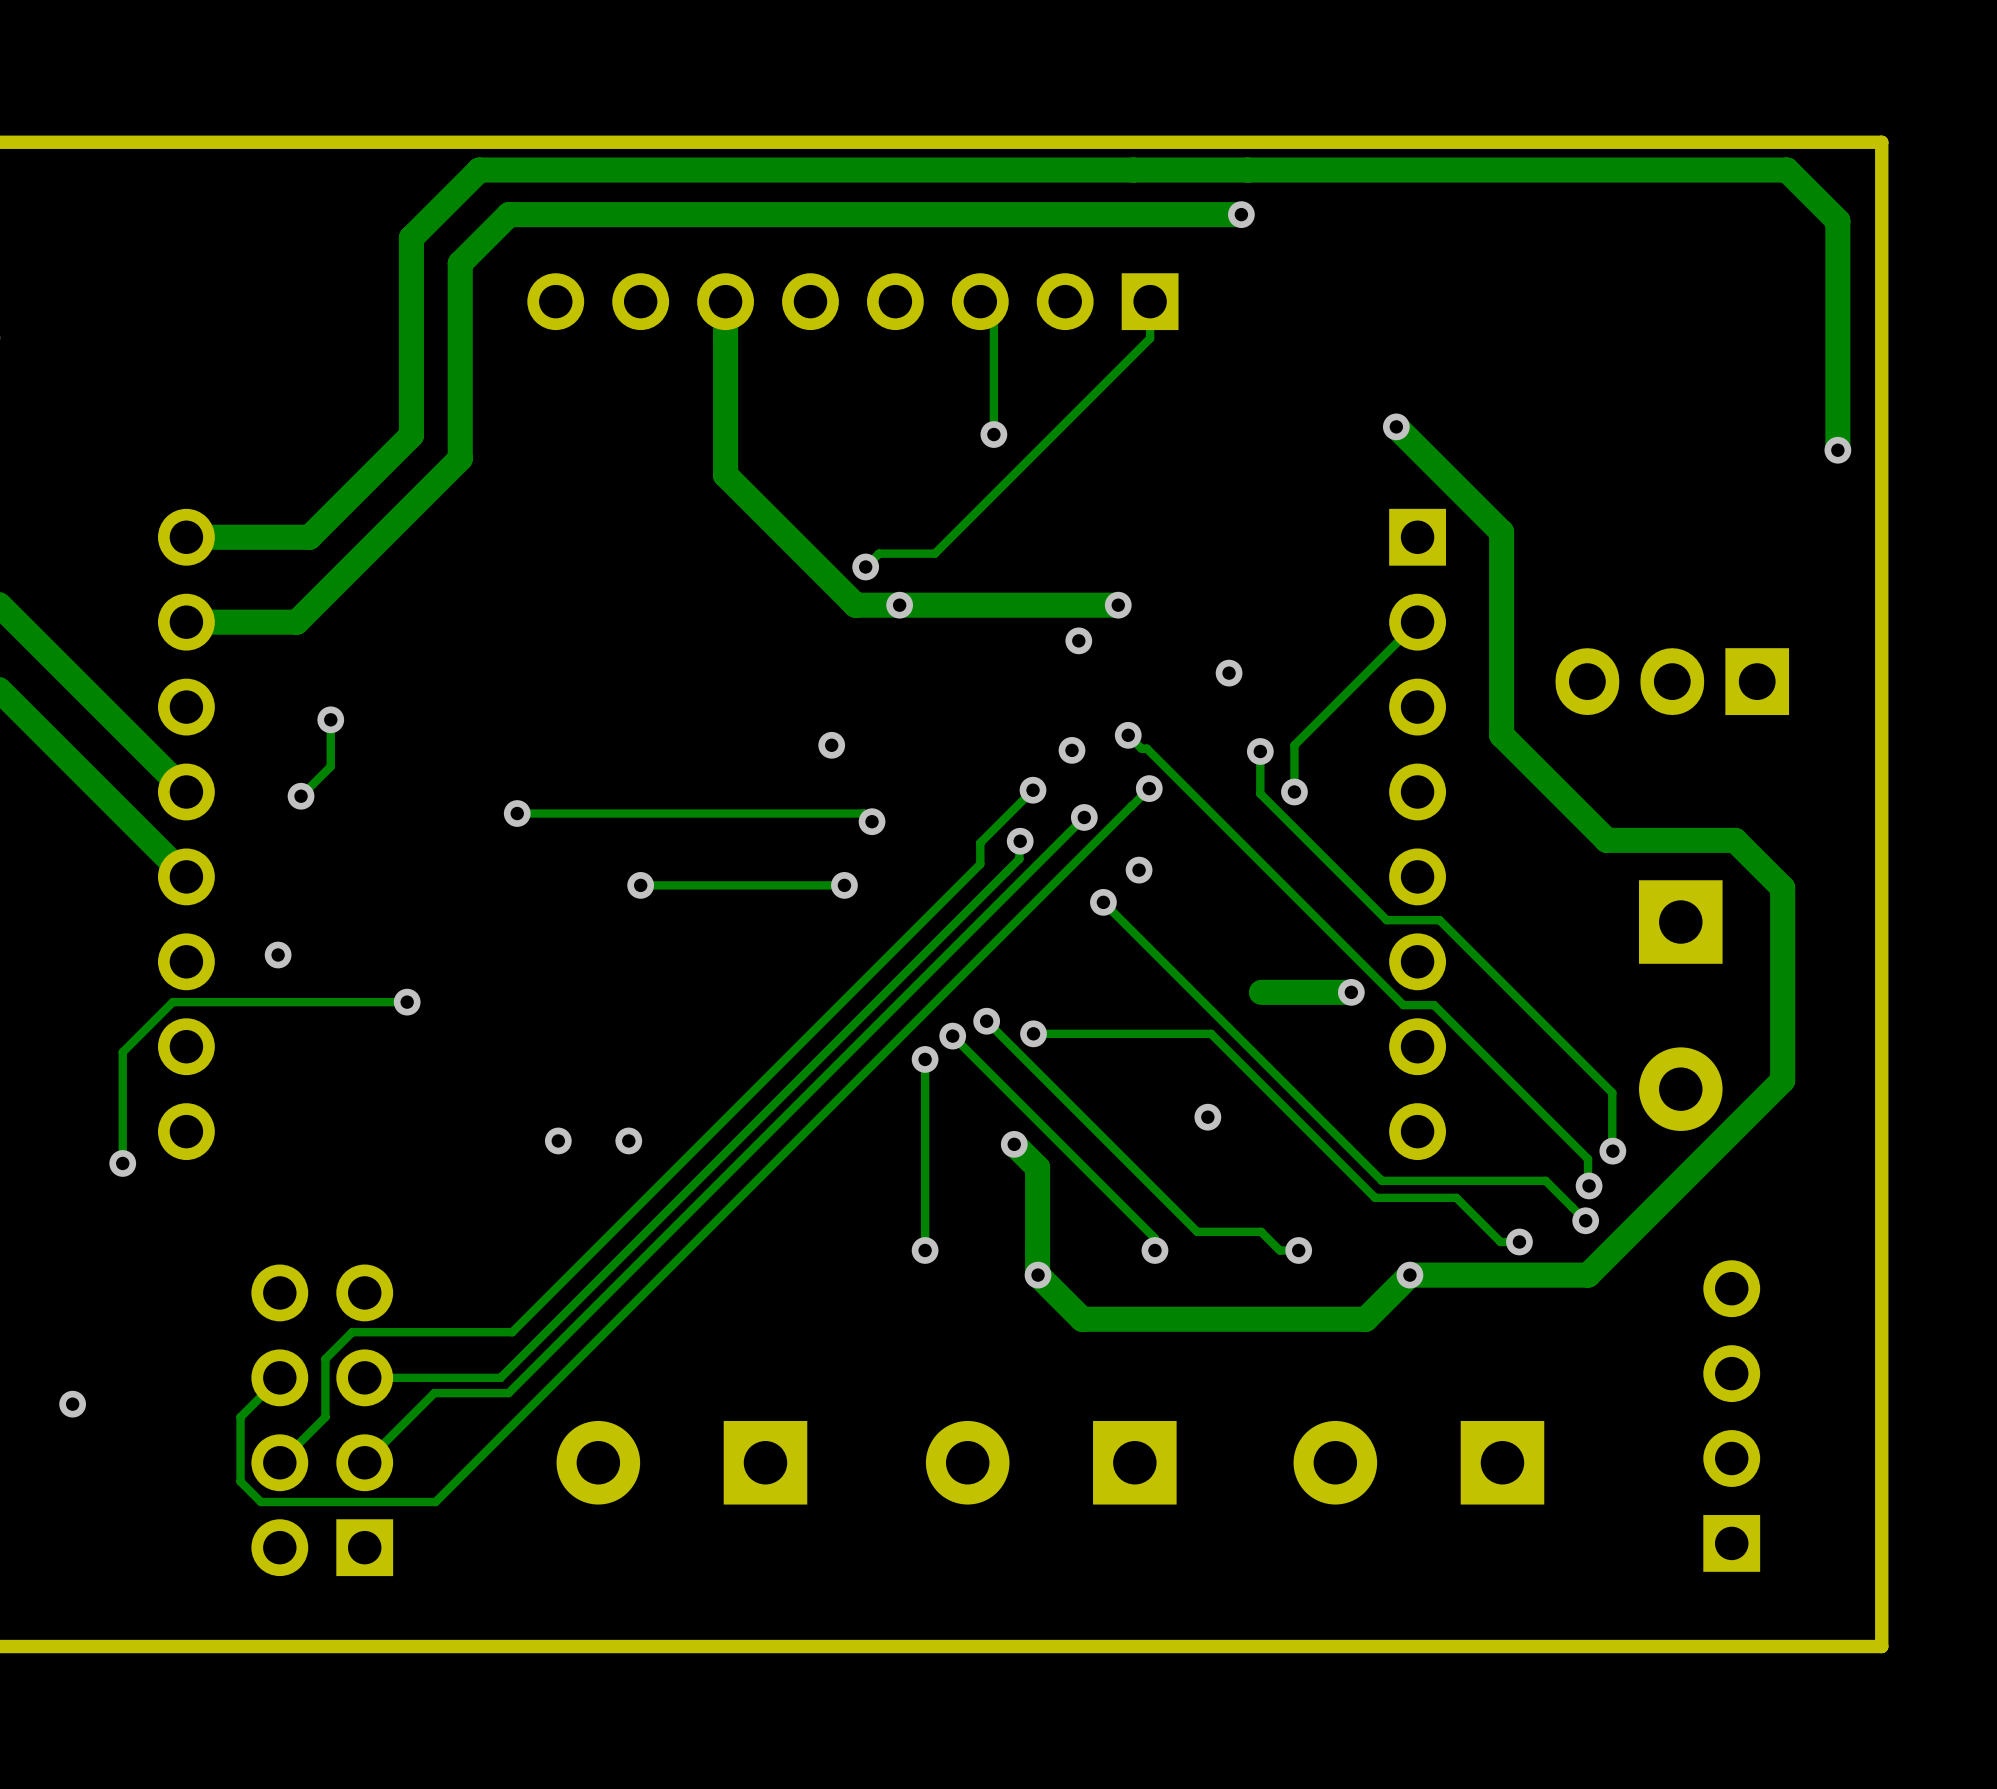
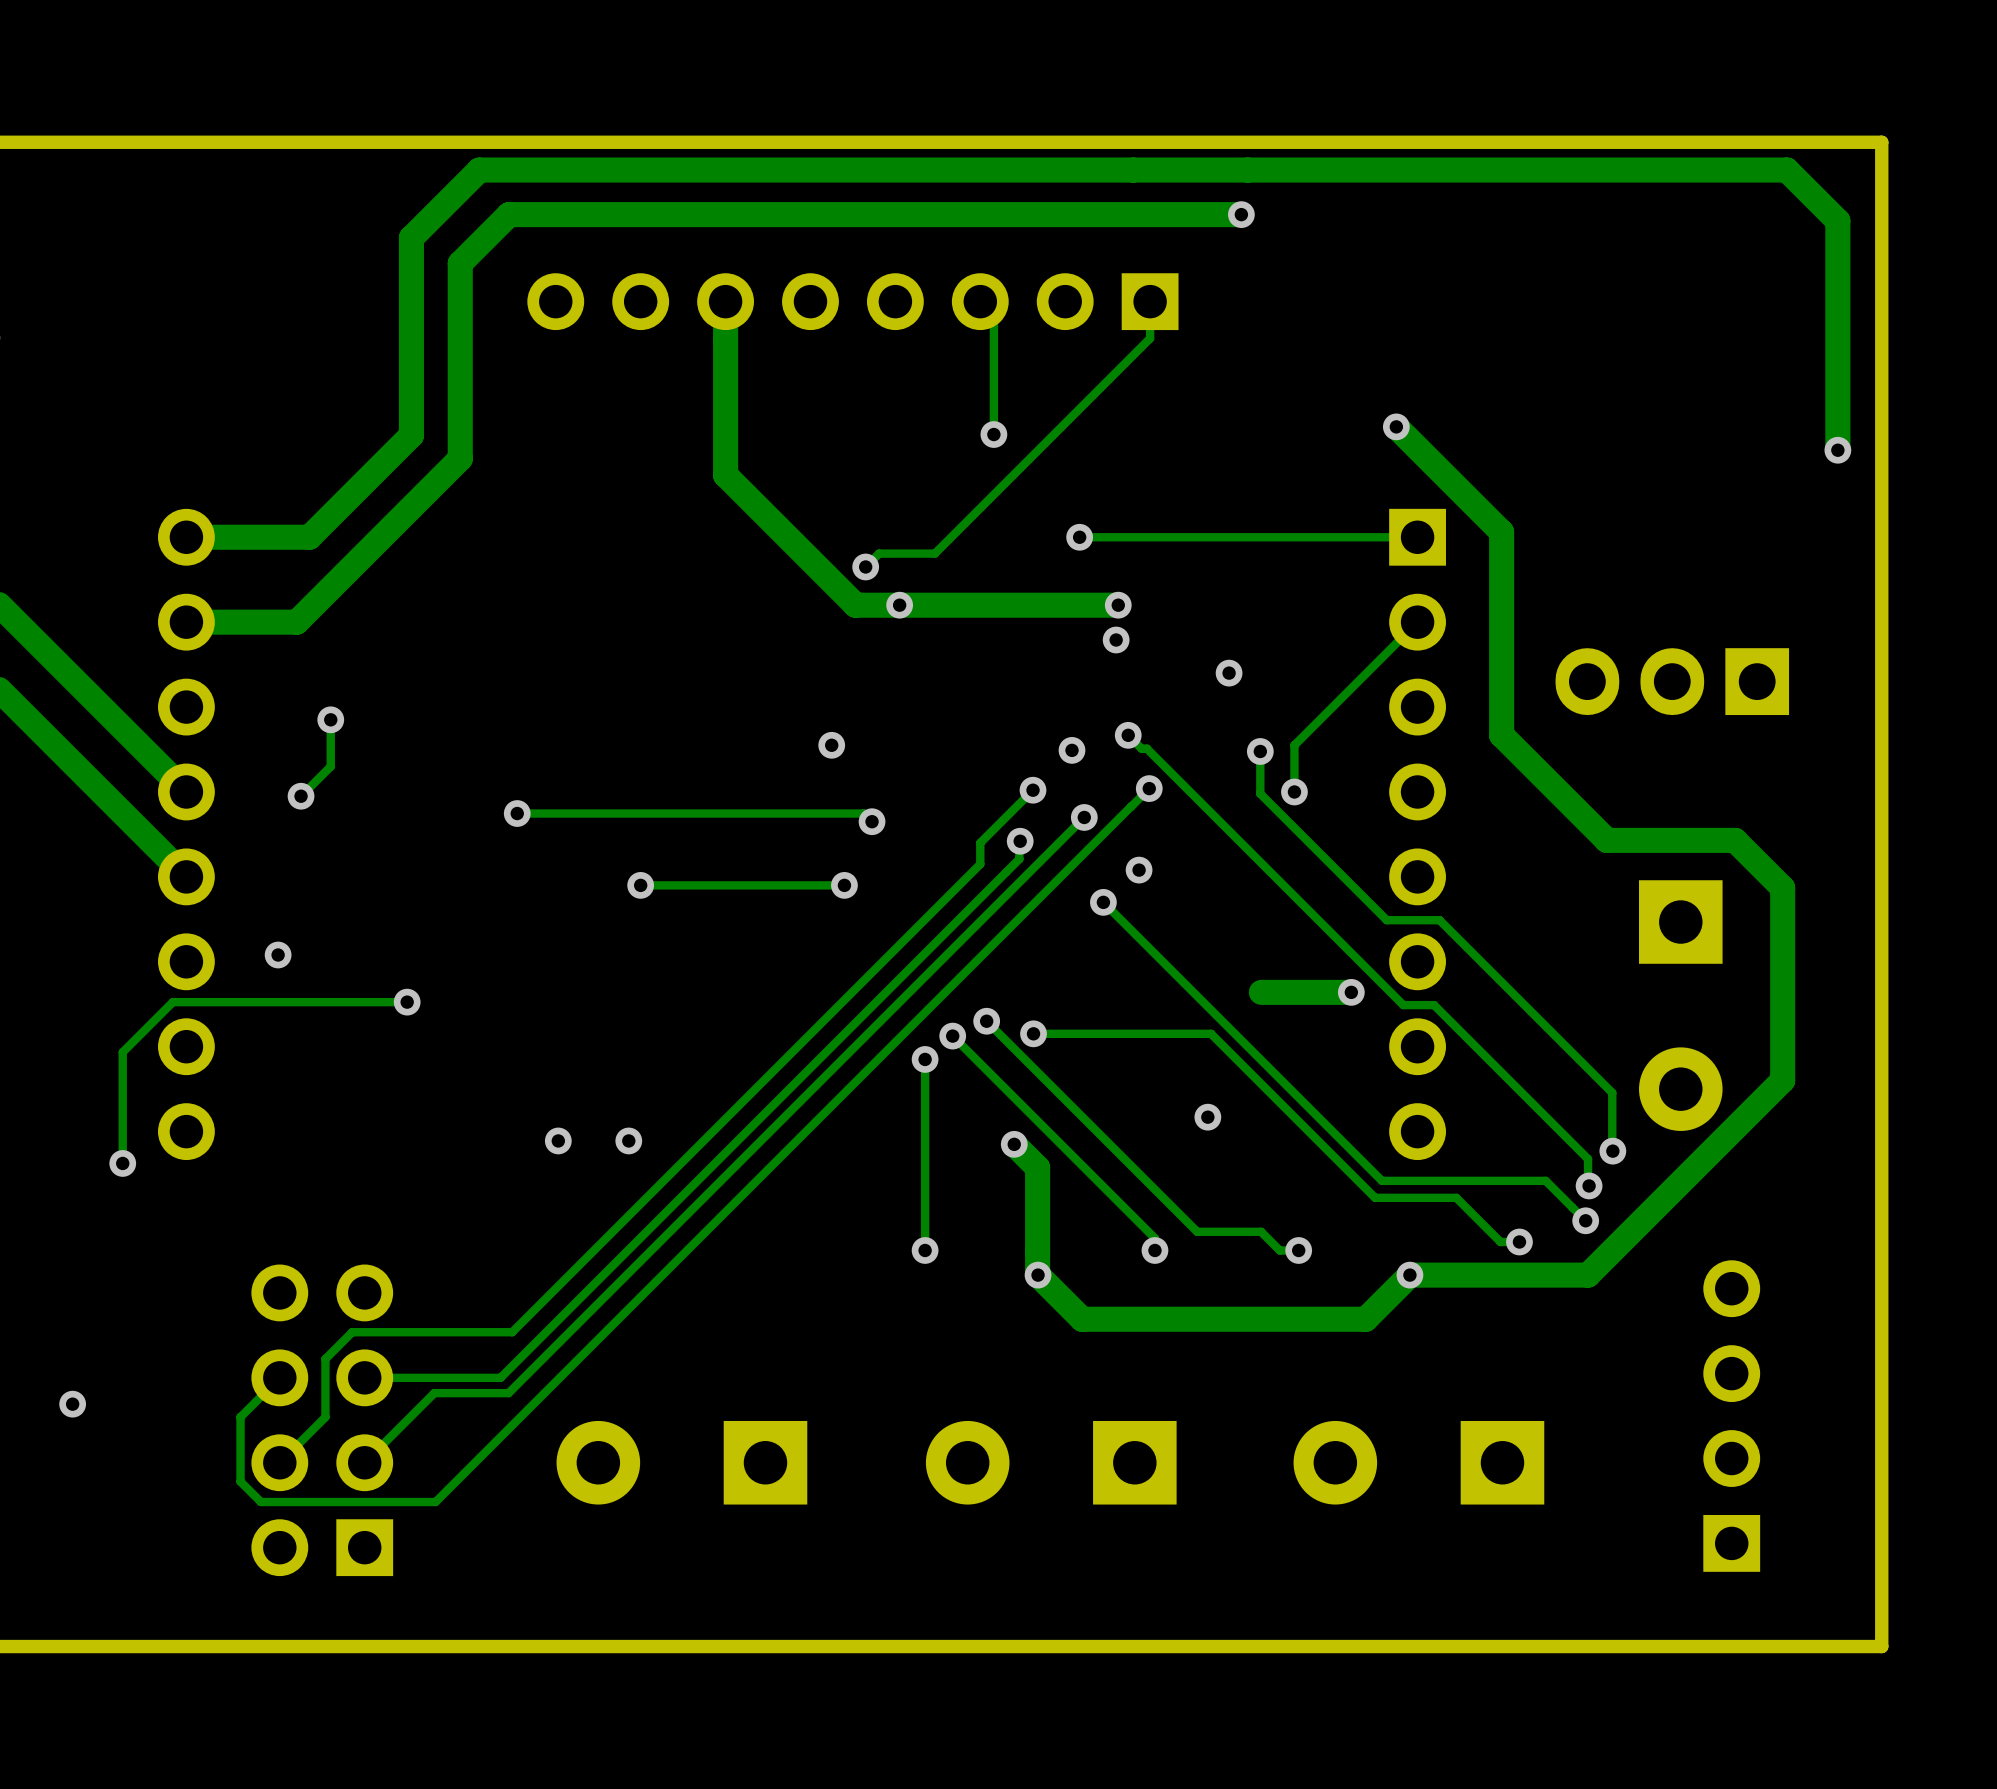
via: none -> (1079, 537)
track: none -> (1417, 537) (1079, 537)
via position: (1078, 640) -> (1116, 640)

